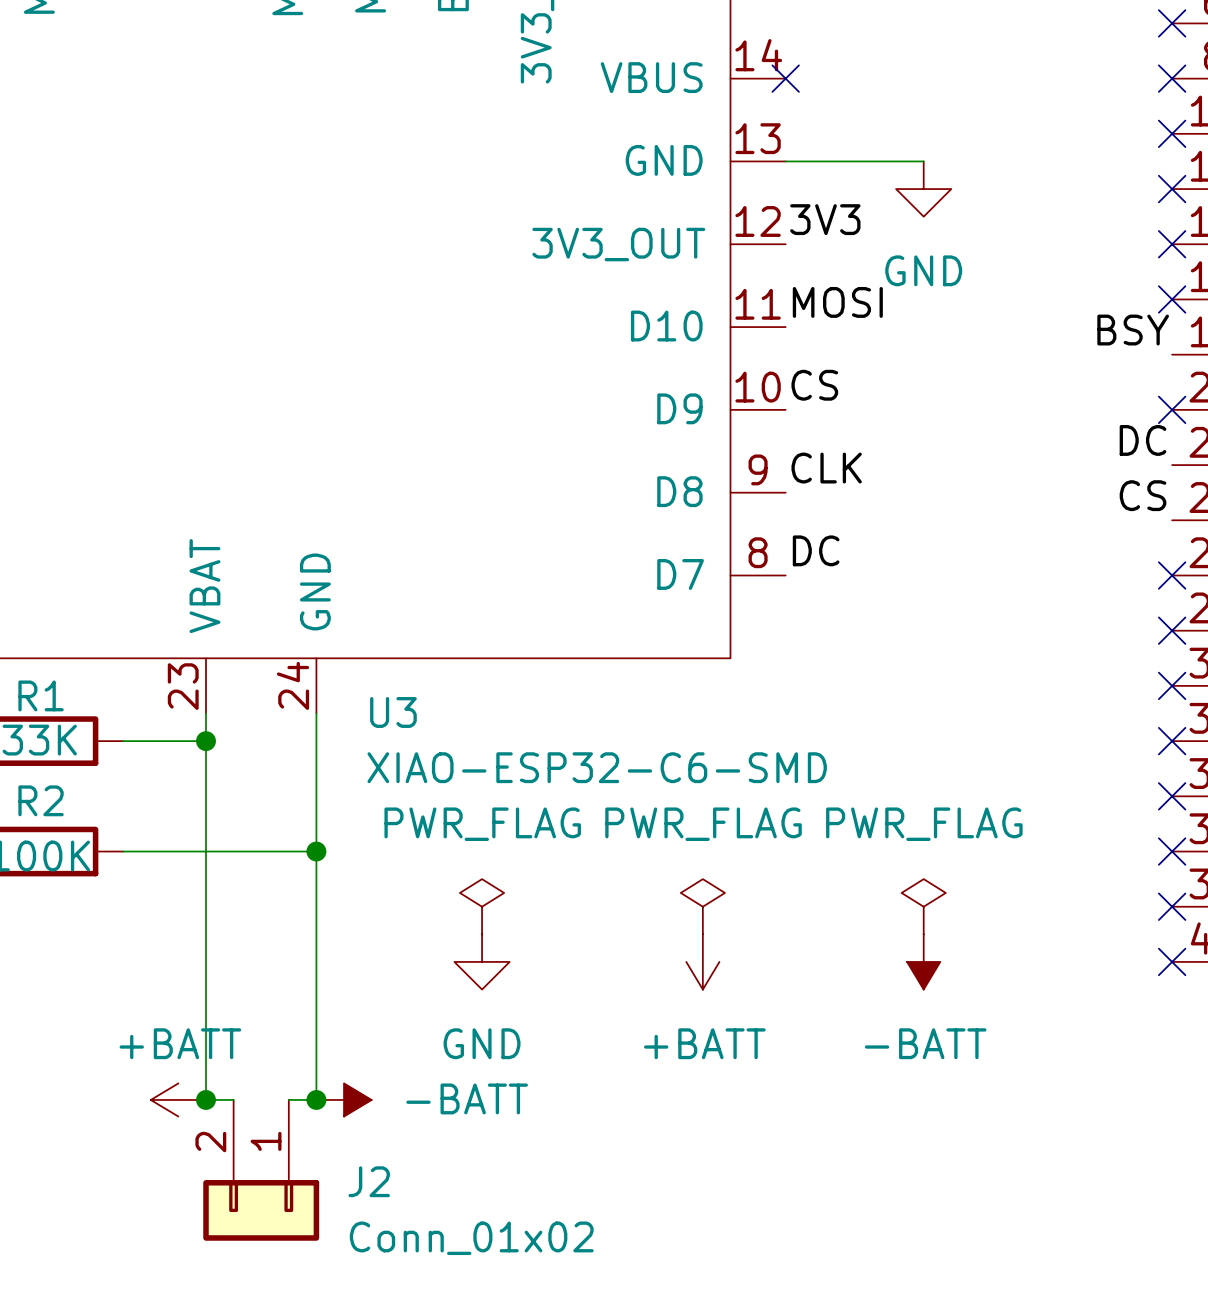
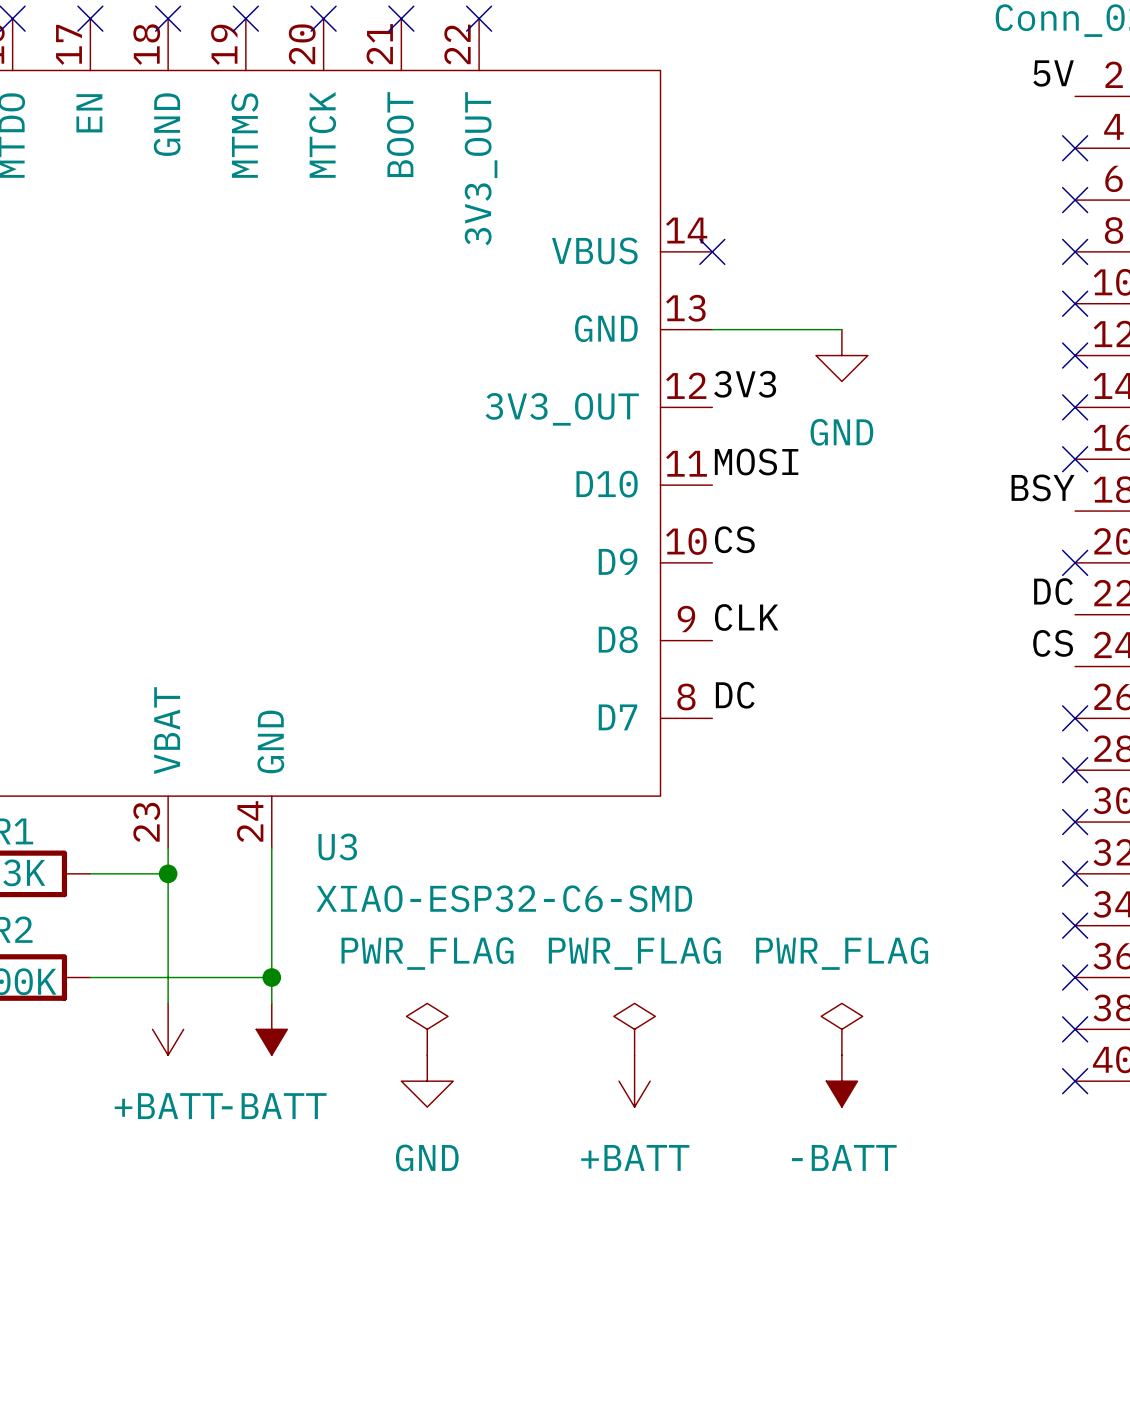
wire: (206, 879) (206, 1099) (233, 1099) -> none
wire: (316, 879) (316, 1099) (288, 1099) -> none
power symbol text position: +BATT (180, 1043) -> +BATT (168, 1106)
power symbol text position: -BATT (467, 1098) -> -BATT (274, 1106)
power symbol rotation: 0° (178, 1099) -> 90° counterclockwise (168, 1029)
power symbol position: +BATT (178, 1099) -> +BATT (168, 1029)
junction: (206, 1099) -> none
junction: (316, 1099) -> none
power symbol rotation: 0° (344, 1099) -> 90° clockwise (271, 1029)
power symbol position: -BATT (344, 1099) -> -BATT (271, 1029)
J2: Conn_01x02 (261, 1170) -> none

